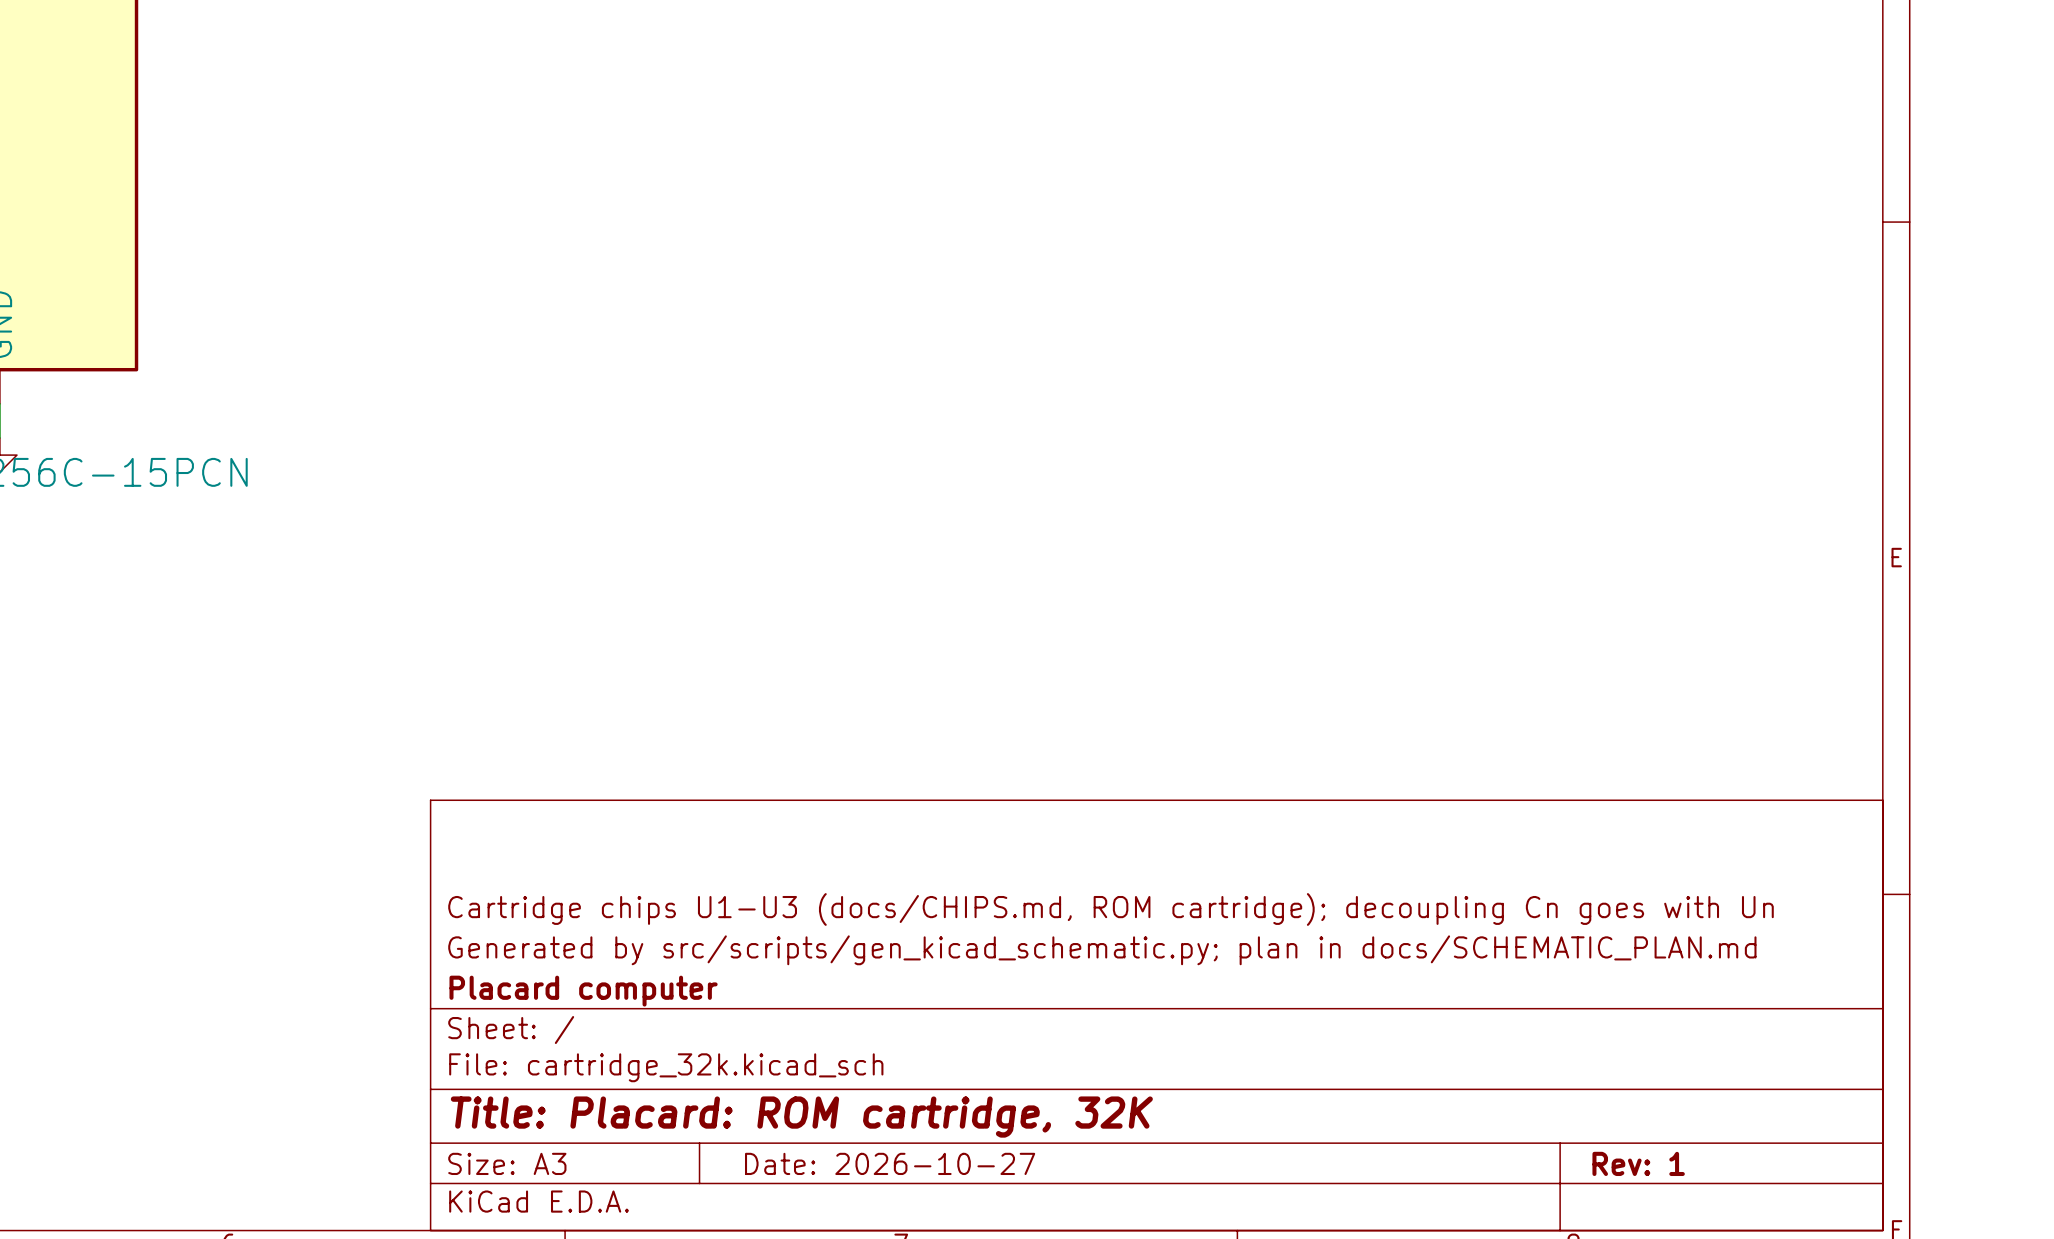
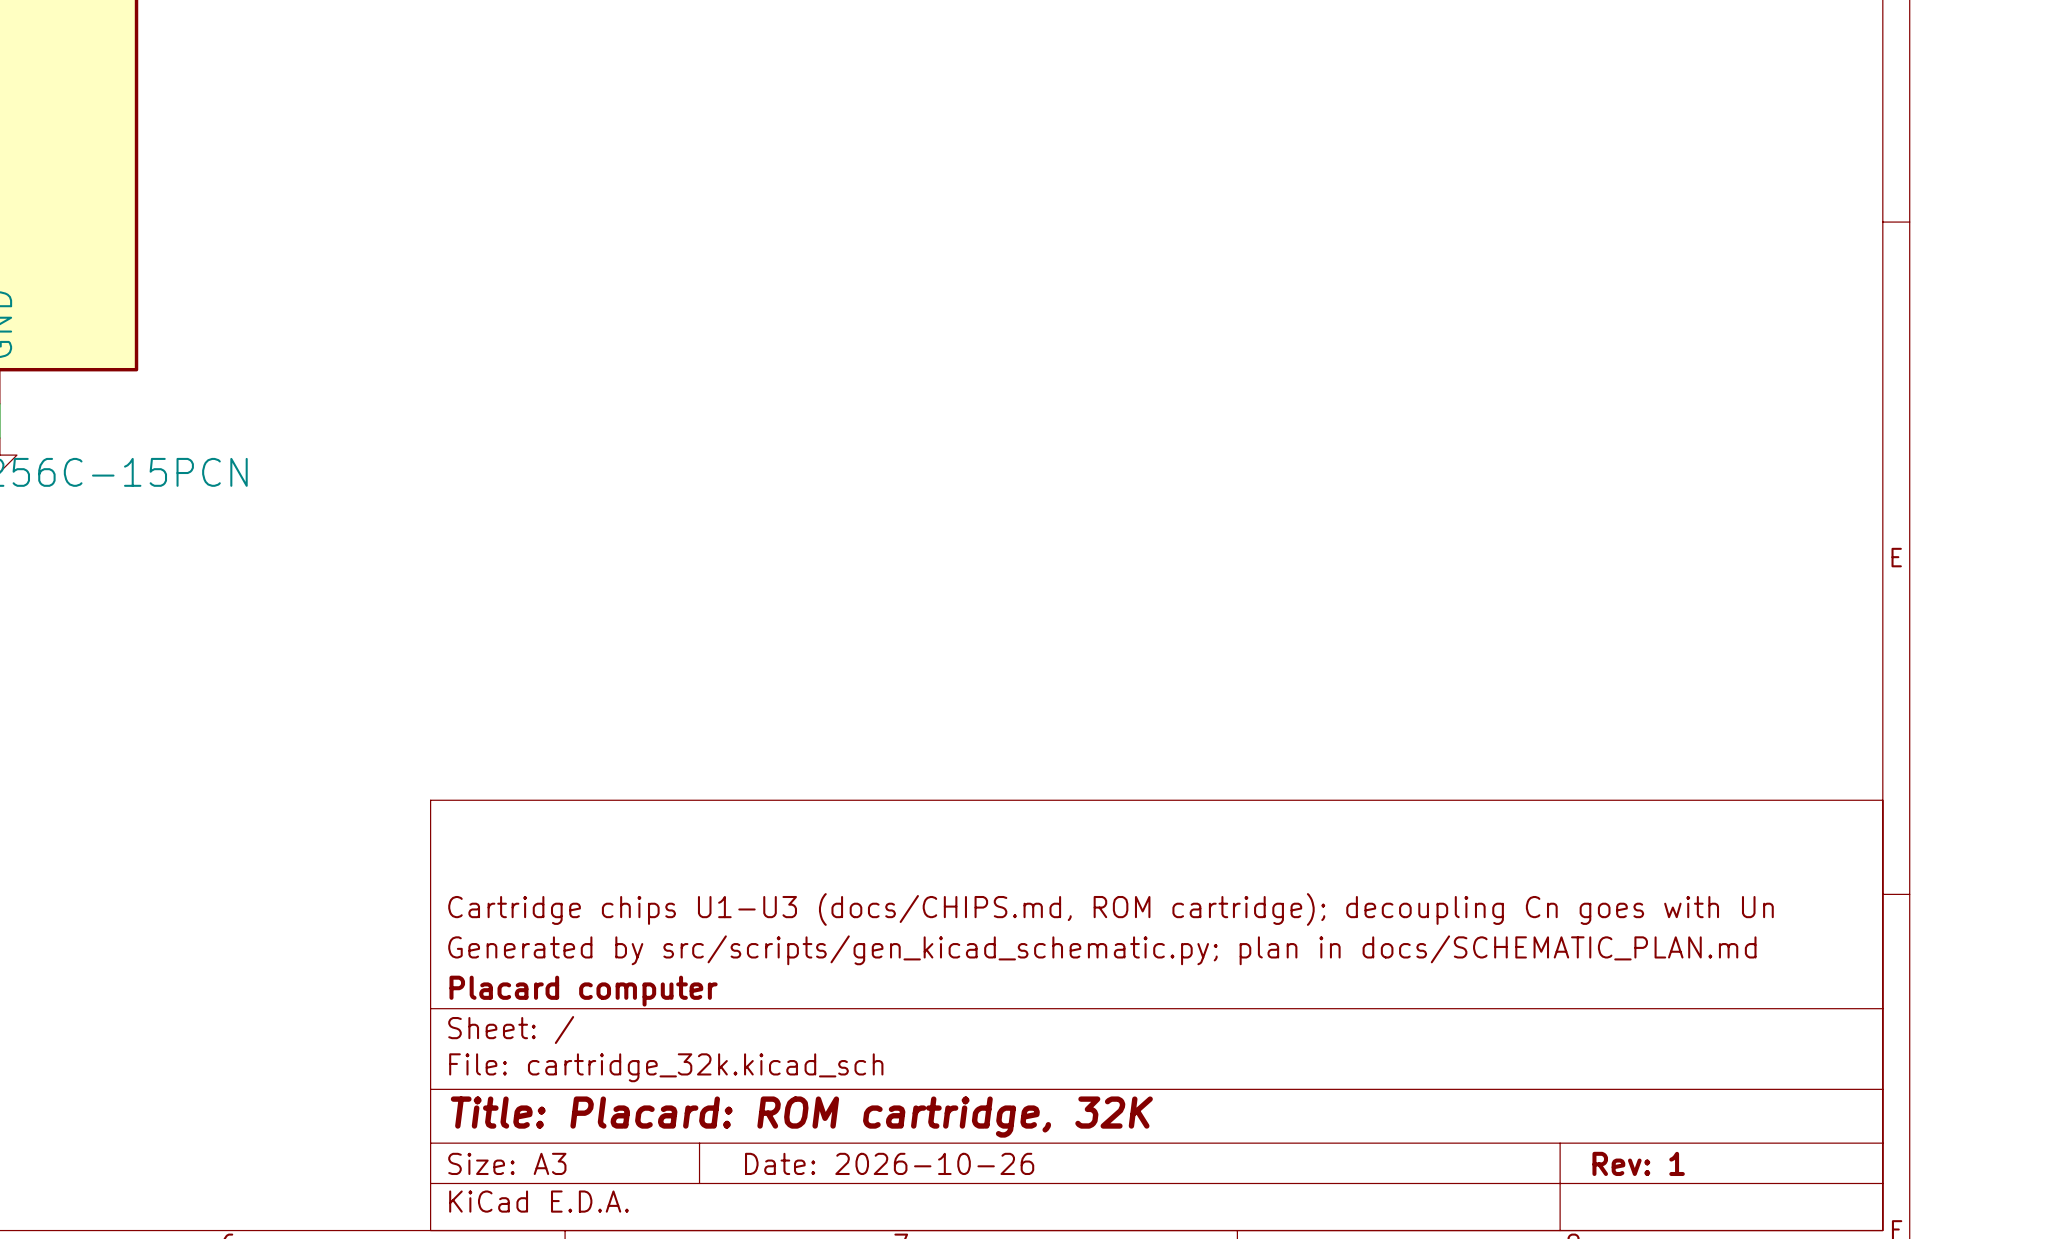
title block: Date: 2026-10-27 (890, 1163) -> Date: 2026-10-26 (889, 1163)

